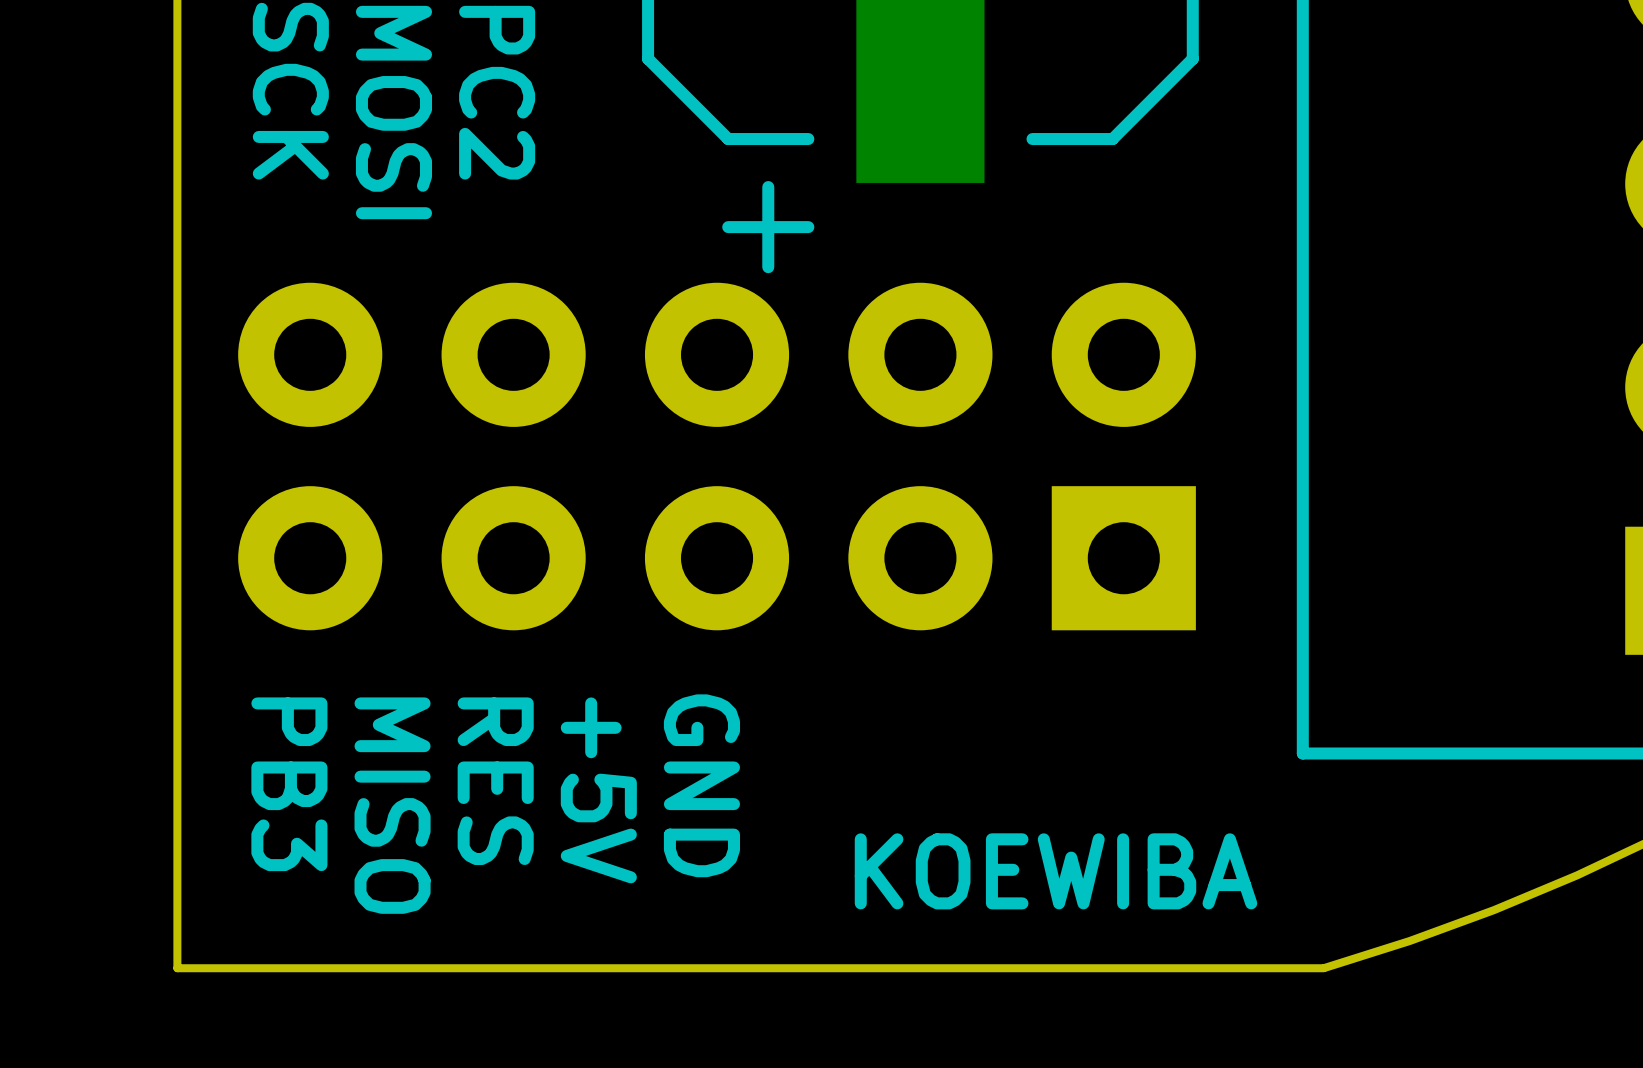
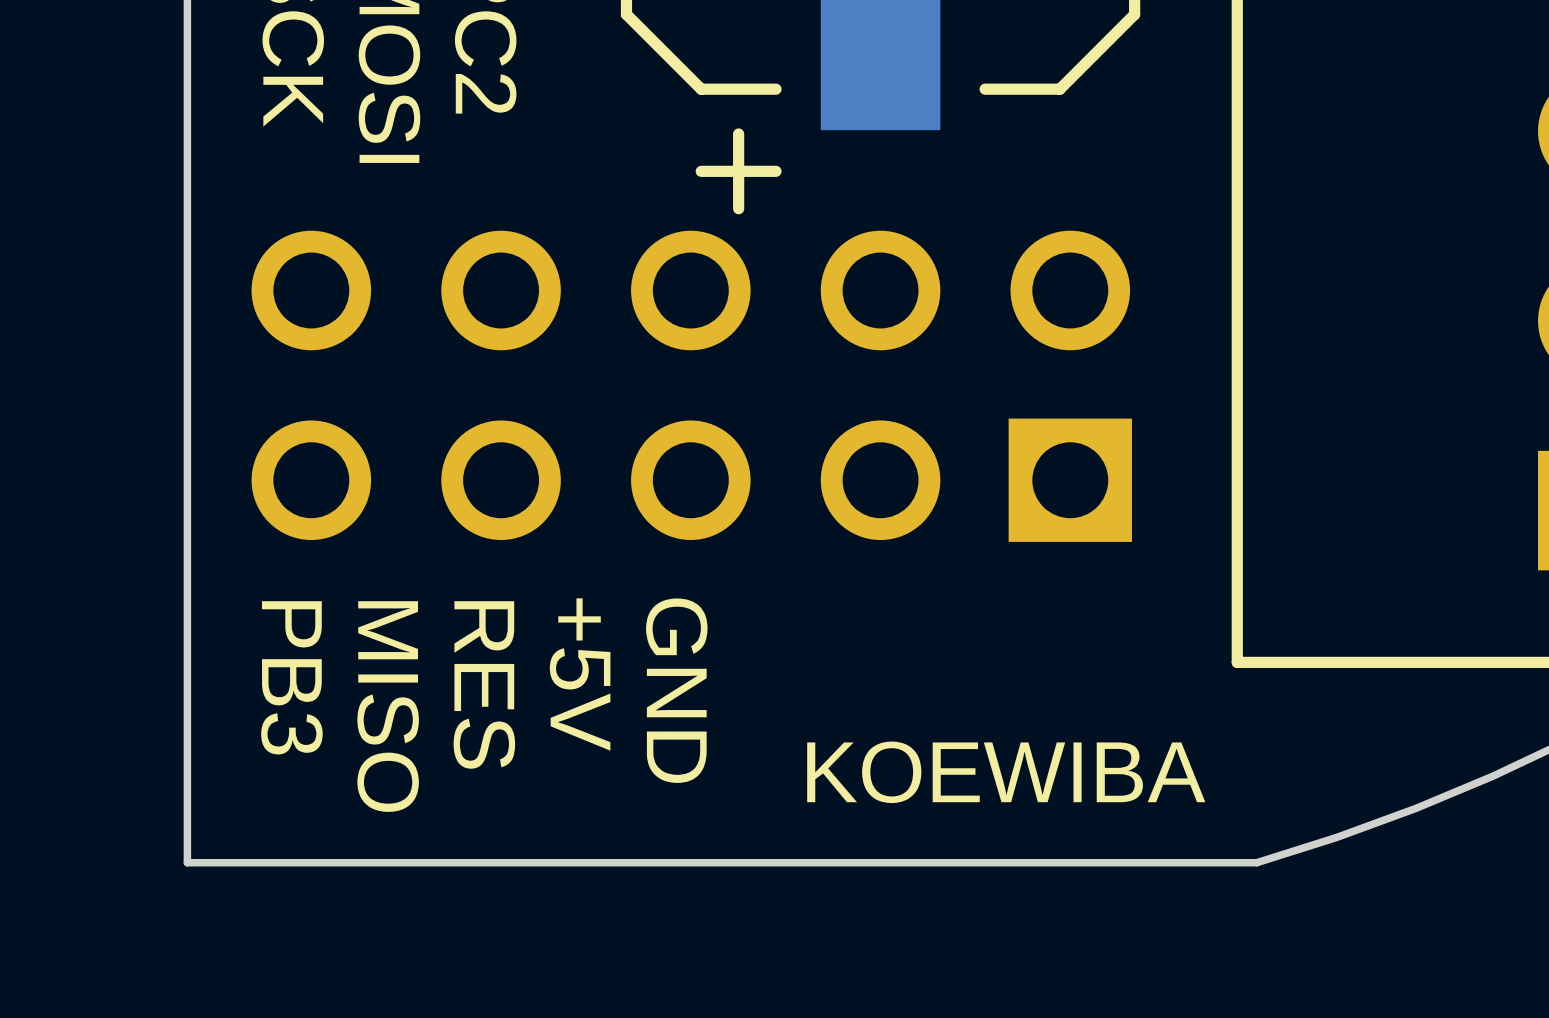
part footprint: [238, 282, 1196, 631] -> [251, 230, 1132, 542]

